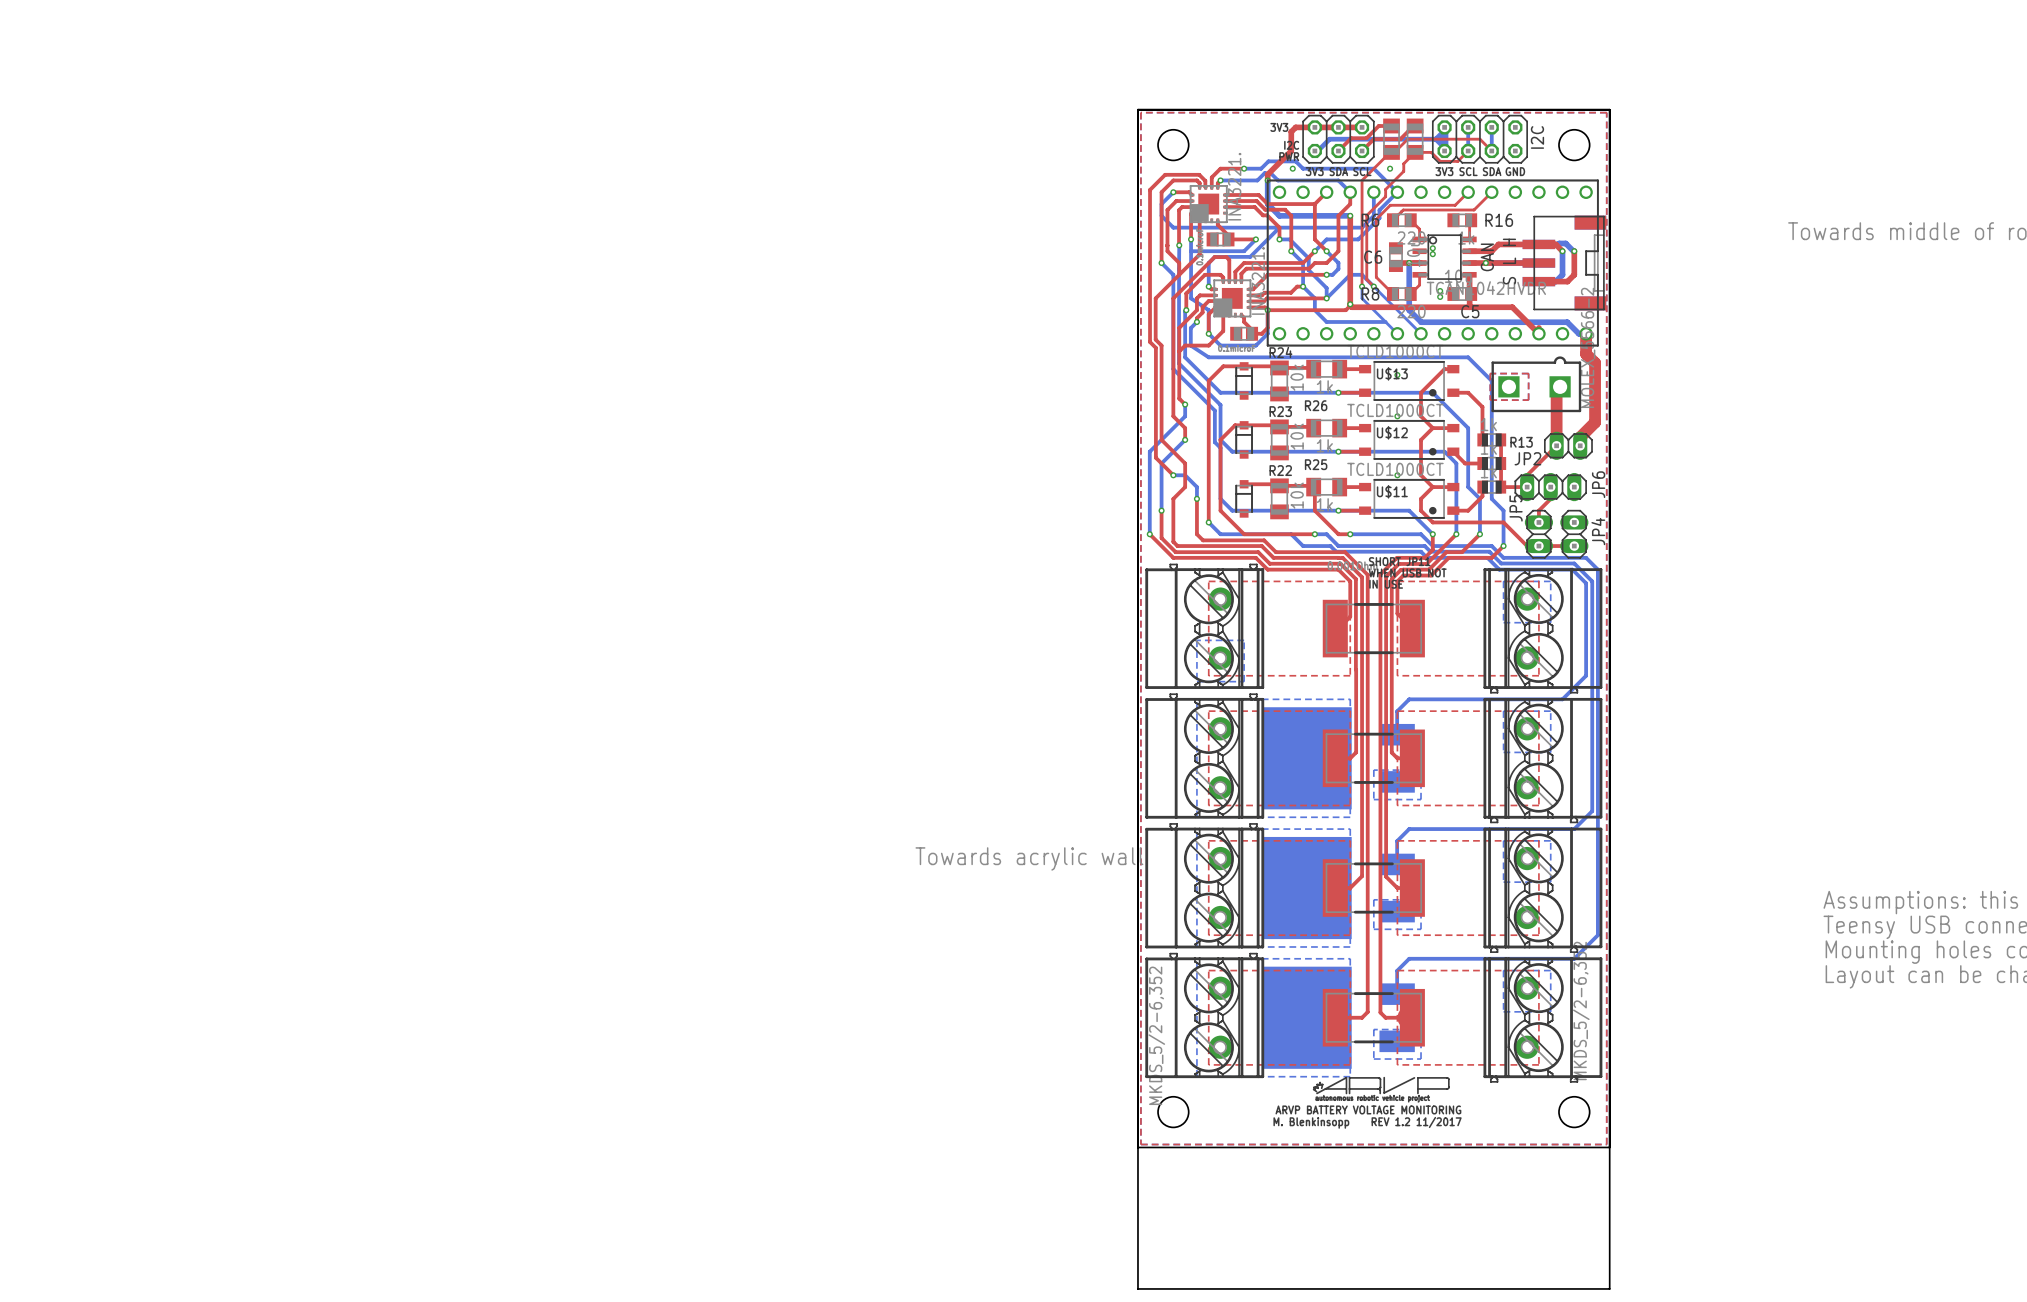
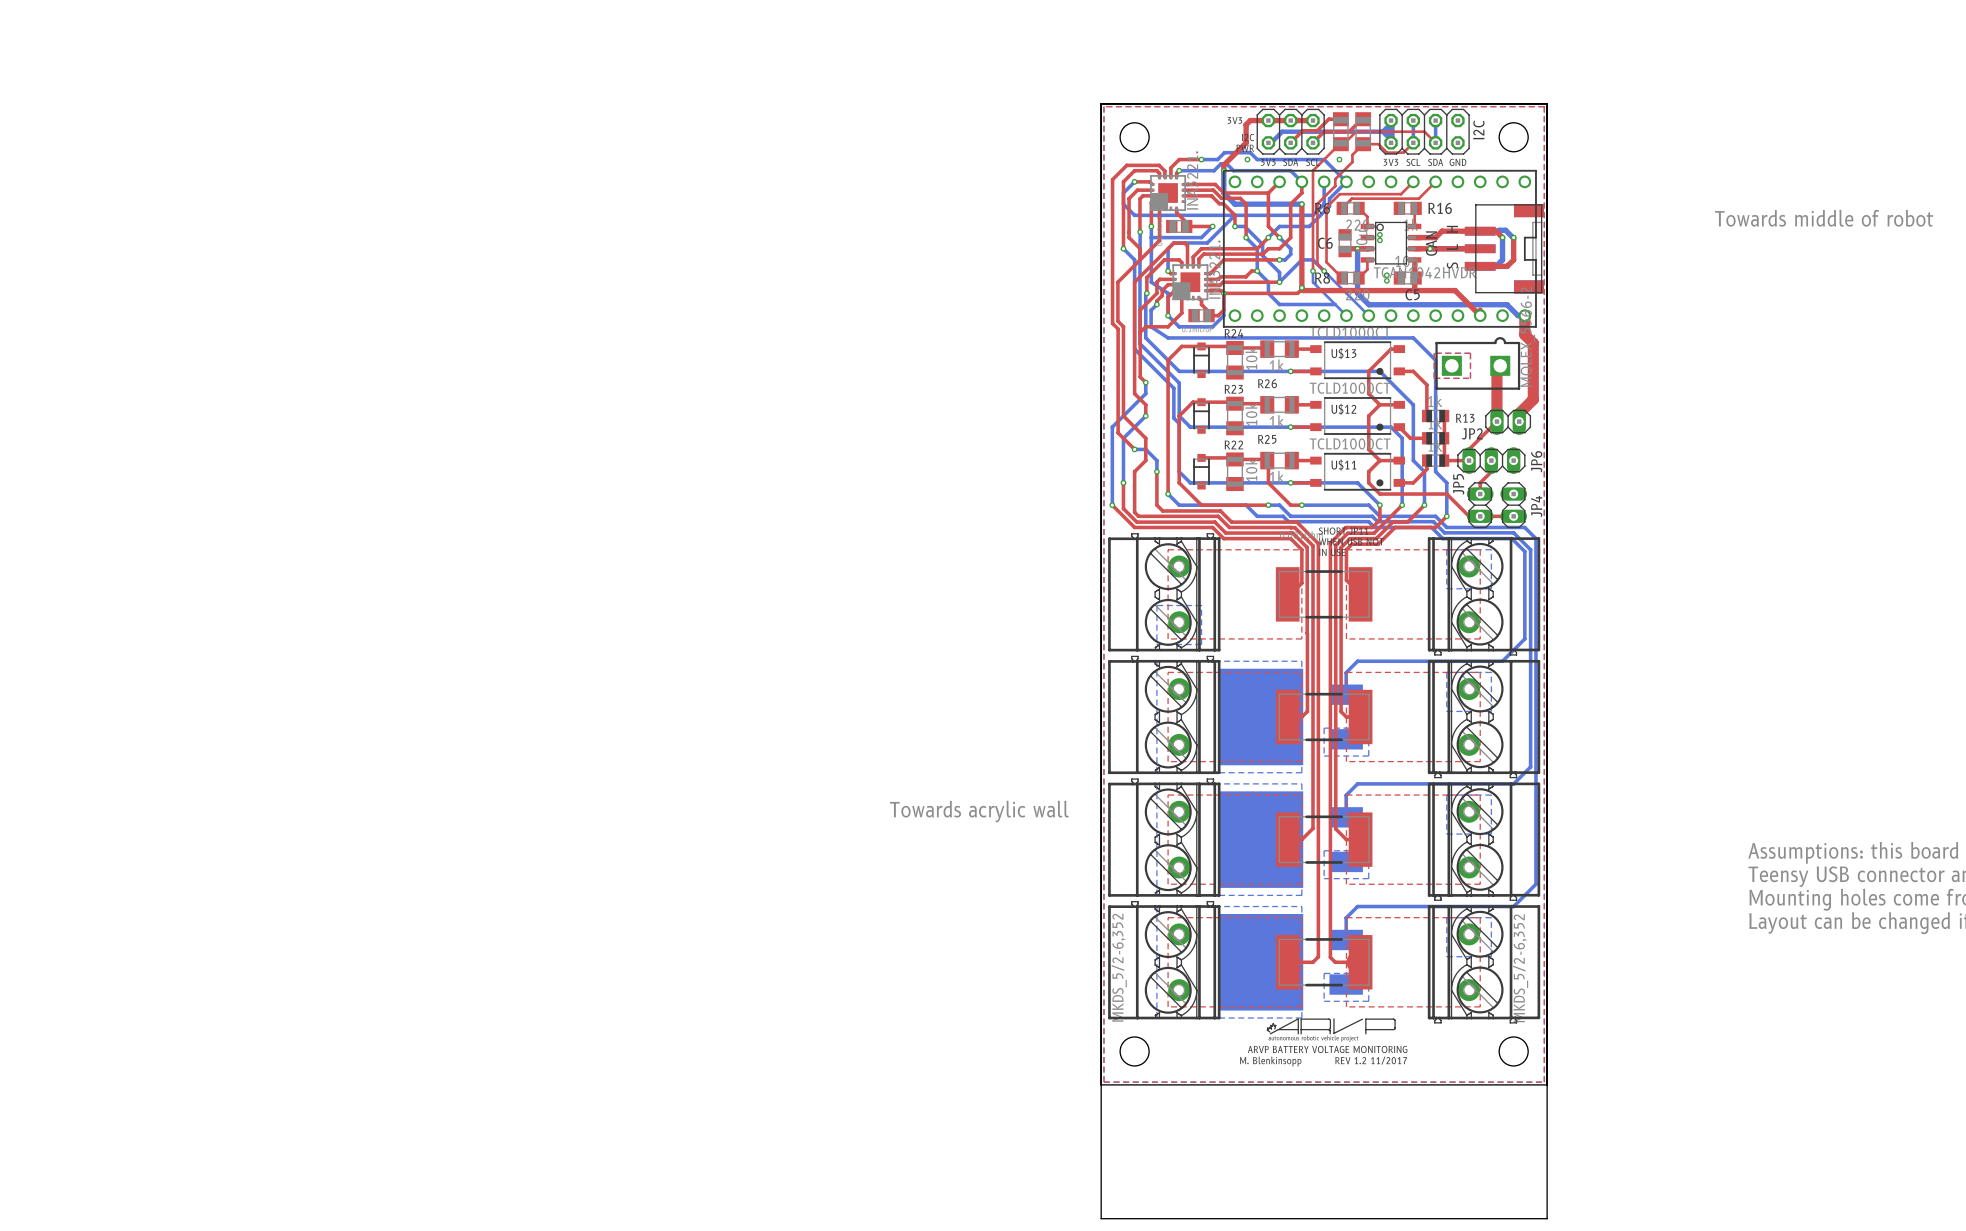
via: (1397, 375) -> none
via: (1397, 416) -> none
via: (1397, 475) -> none

